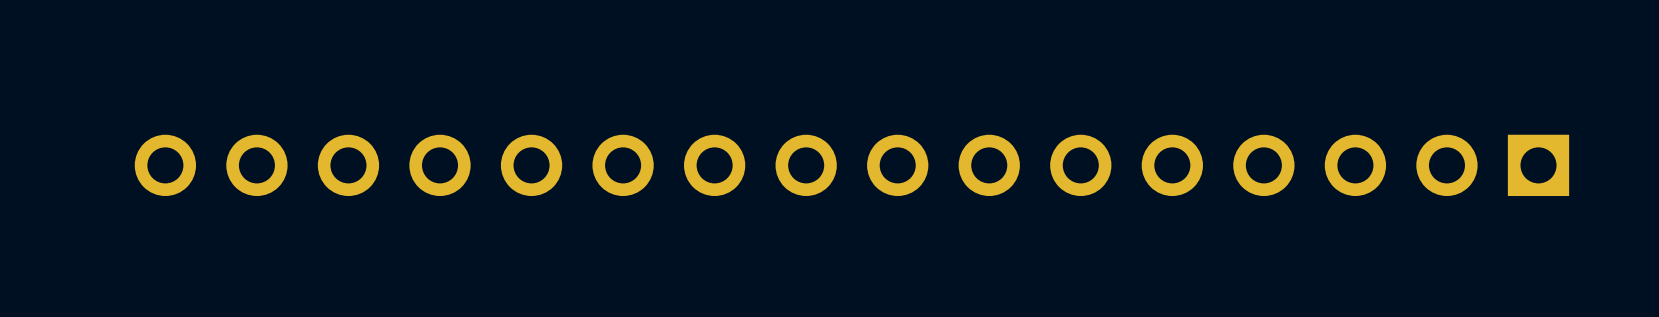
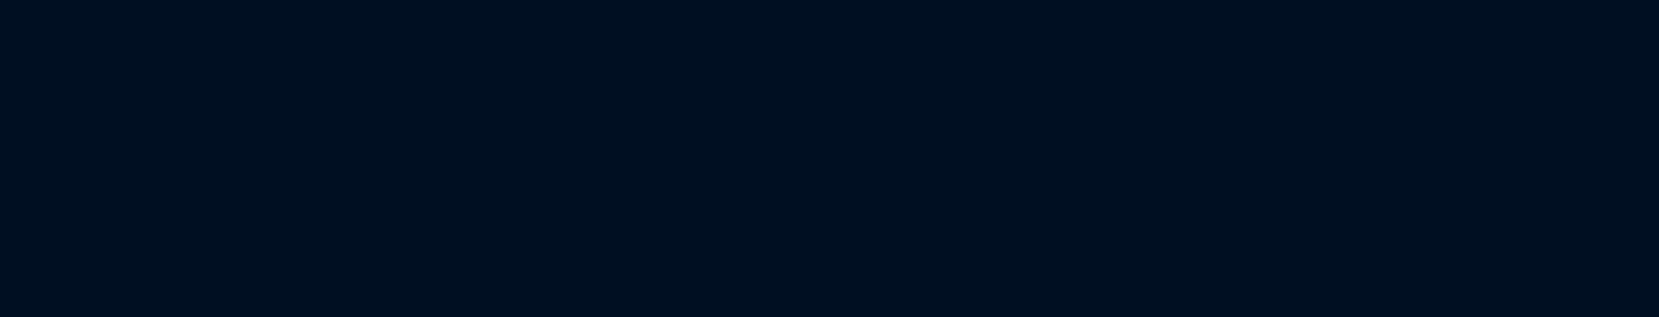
part: (851, 165) -> none

